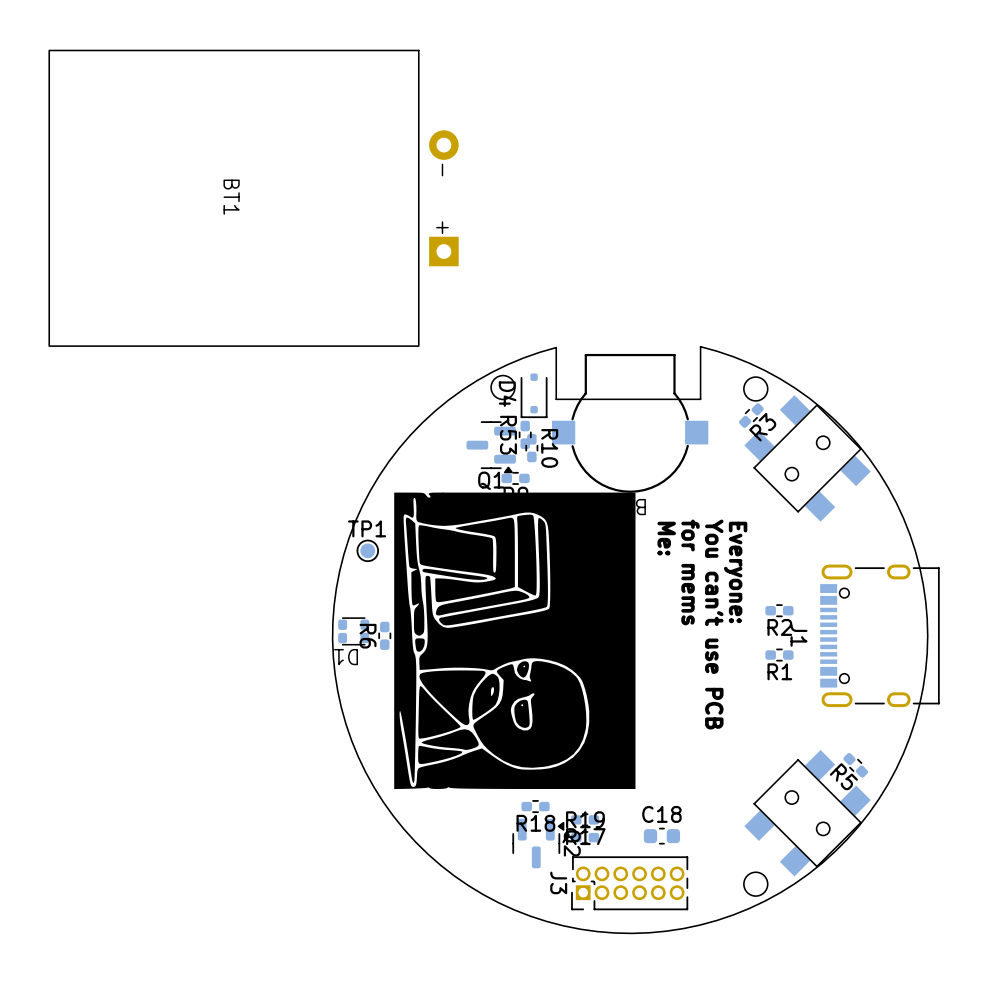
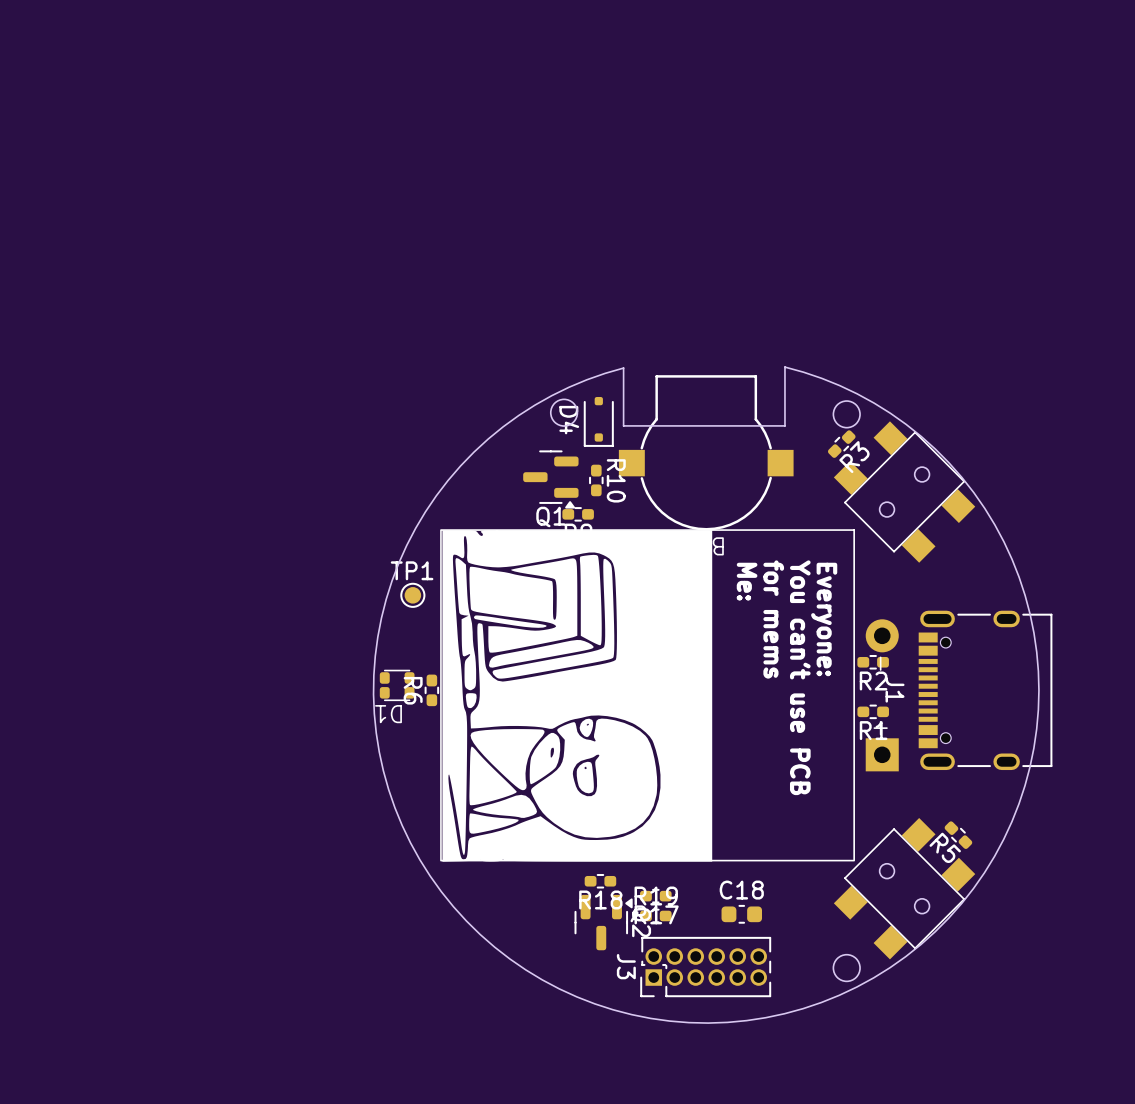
BT1 position: (253, 198) -> (669, 695)
R53: (525, 434) -> none

